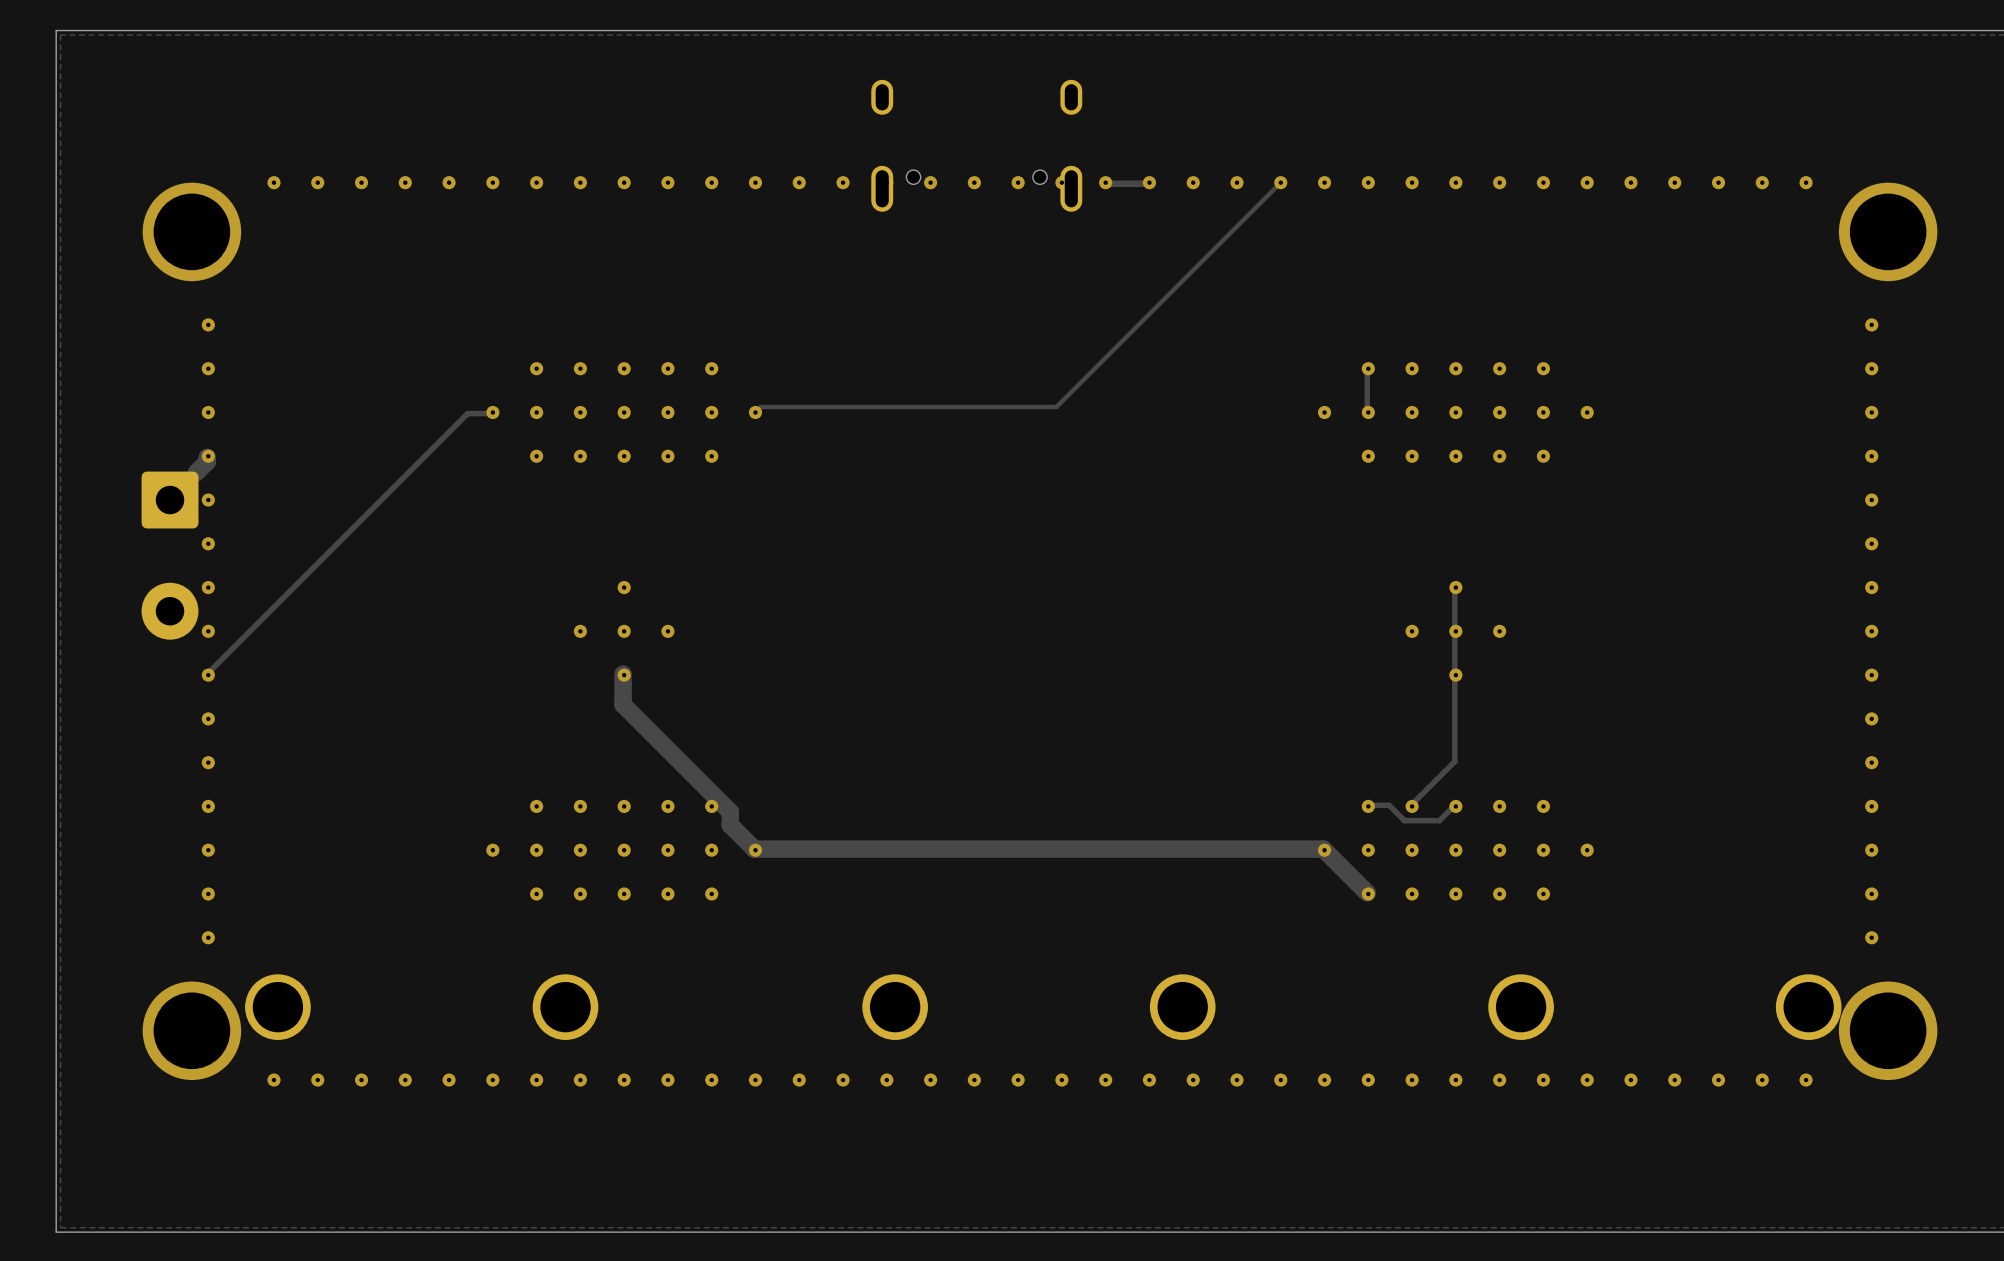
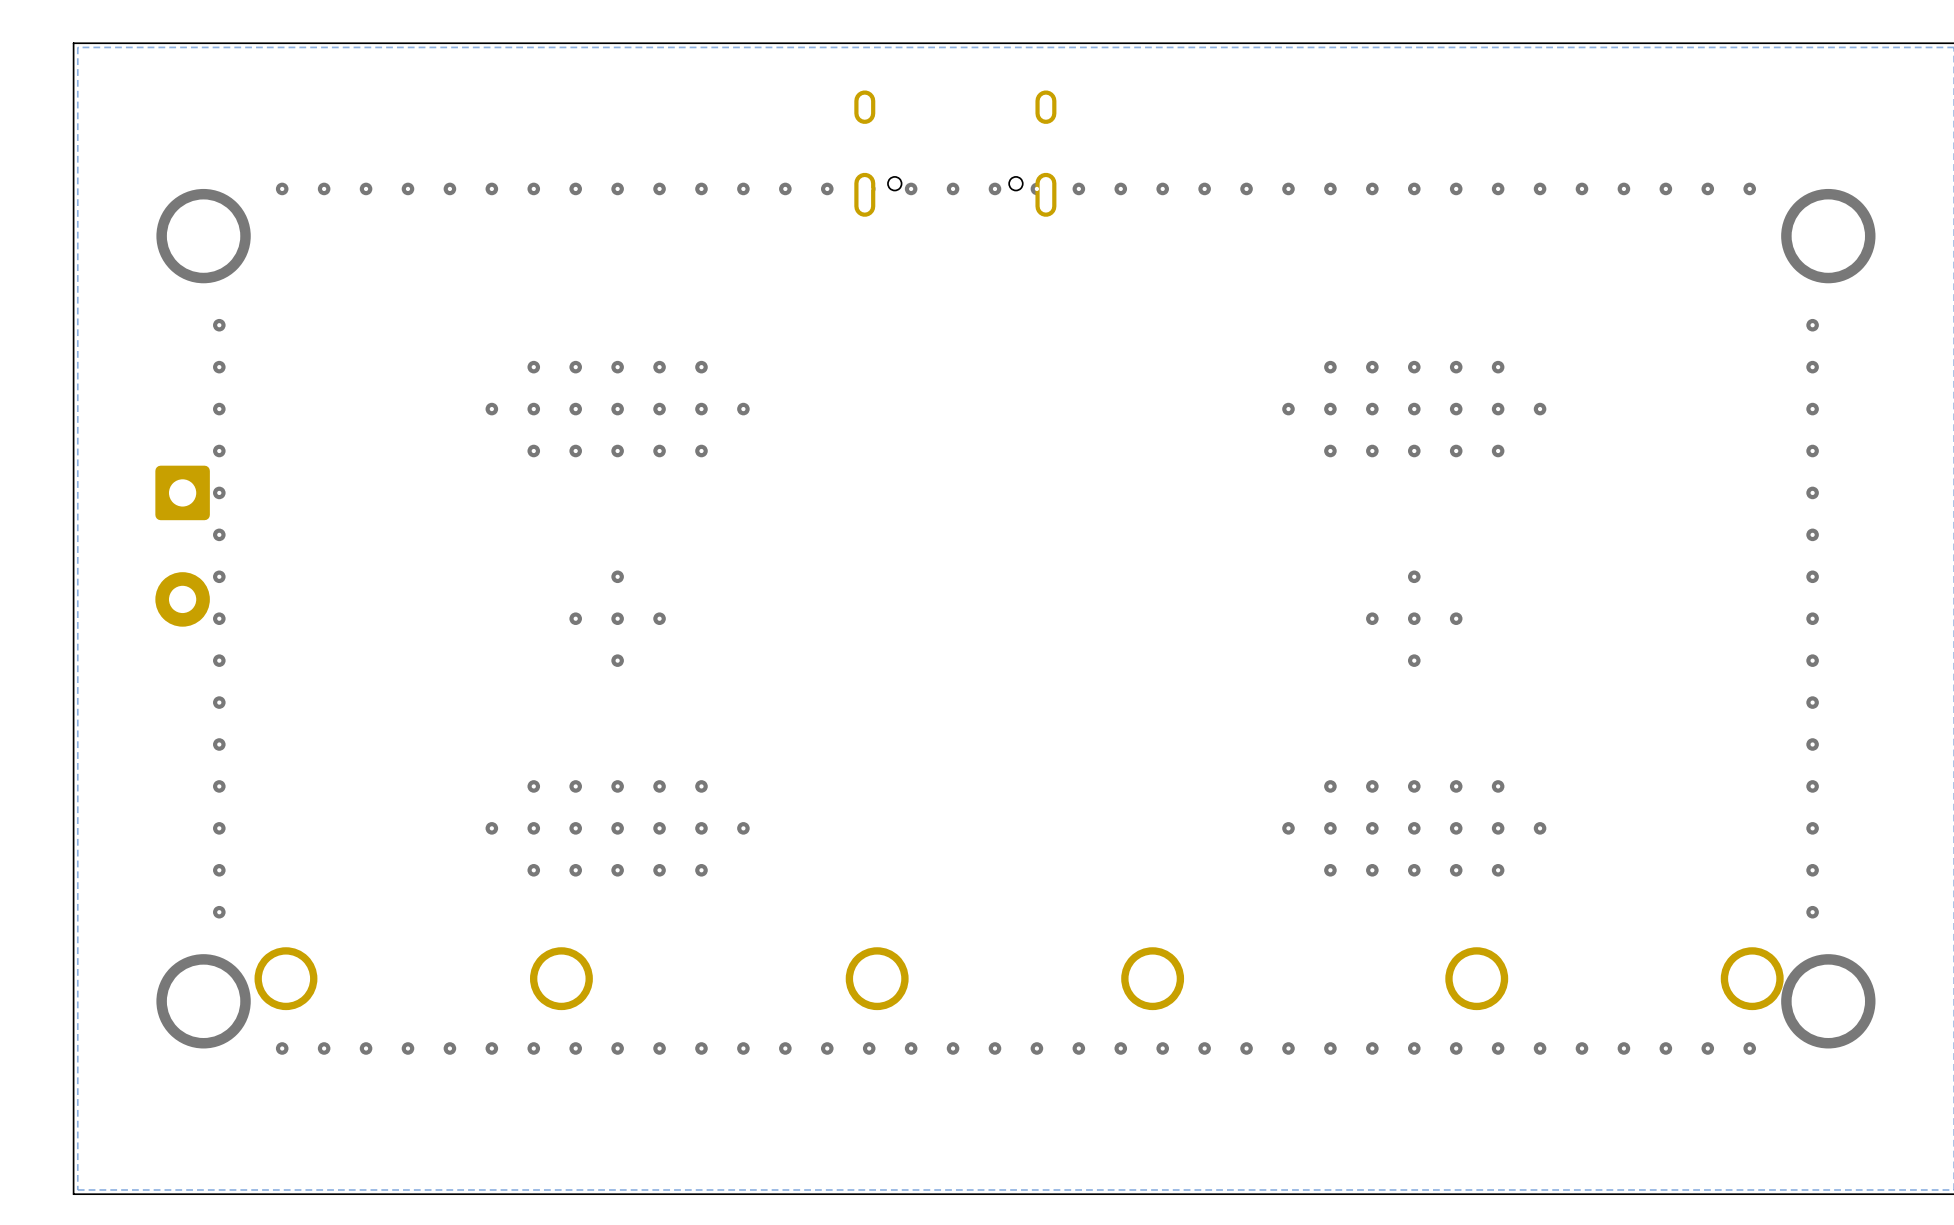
track: (1148, 183) (1104, 183) -> none
track: (1279, 183) (1056, 407) (760, 407) (754, 413) -> none
track: (1367, 369) (1367, 413) -> none
track: (491, 413) (467, 413) (207, 674) -> none
track: (207, 457) (207, 461) (196, 472) -> none
track: (1454, 588) (1454, 761) (1411, 805) -> none
track: (623, 674) (623, 704) (730, 811) (730, 825) (754, 849) (1323, 849) (1367, 892) -> none
track: (1454, 805) (1439, 820) (1404, 820) (1389, 805) (1367, 805) -> none

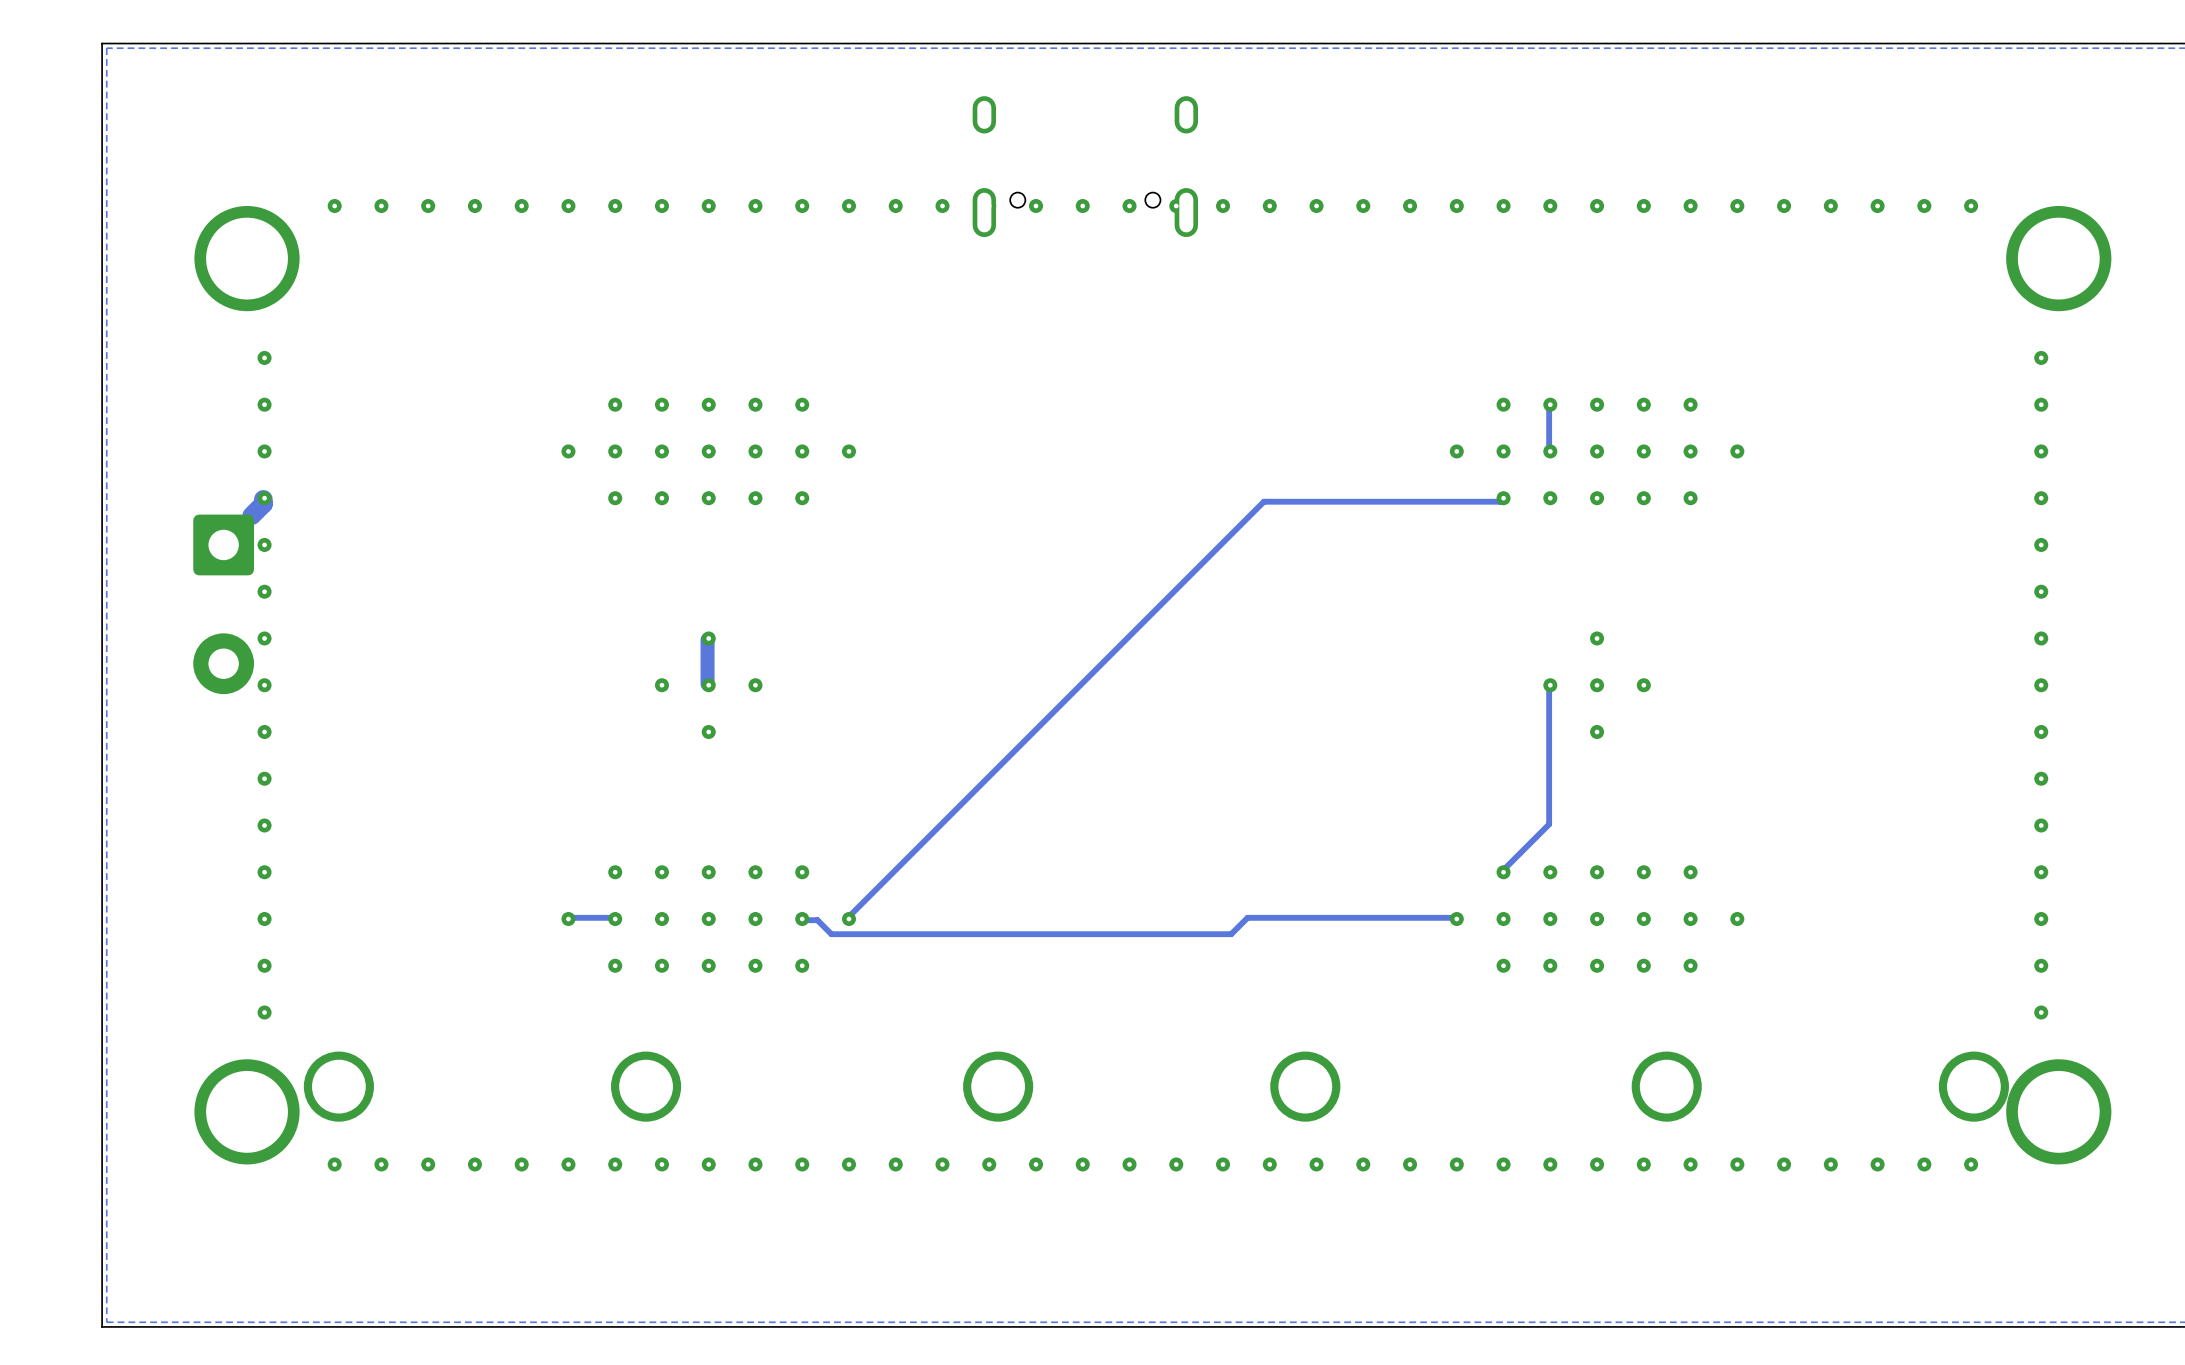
track: none -> (1549, 405) (1549, 452)
track: none -> (263, 499) (263, 504) (251, 515)
track: none -> (1502, 499) (1500, 501) (1263, 501) (847, 917)
track: none -> (707, 639) (707, 684)
track: none -> (1549, 684) (1549, 824) (1502, 871)
track: none -> (614, 917) (567, 917)
track: none -> (1455, 917) (1247, 917) (1231, 934) (831, 934) (817, 920) (803, 920) (801, 917)

